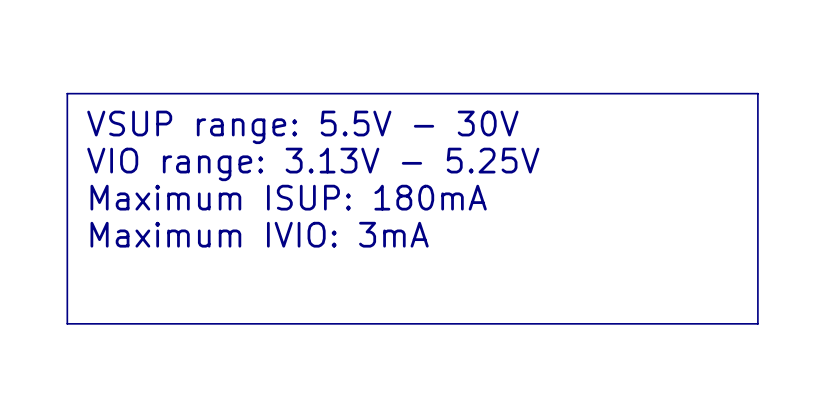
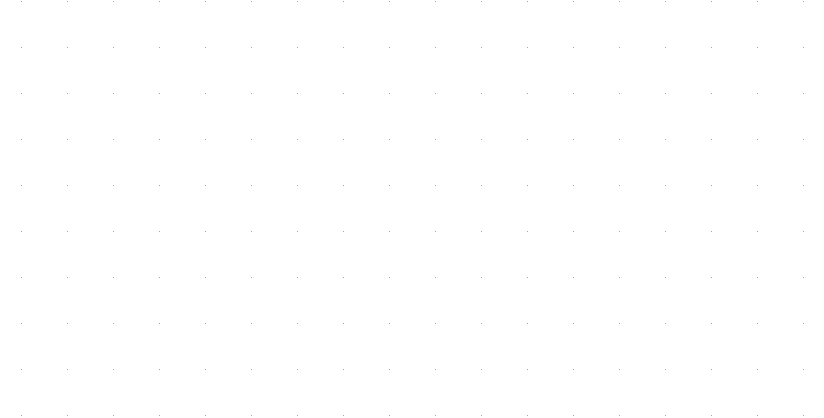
line: (67, 93) (757, 93) (757, 323) (67, 323) (67, 93) -> none
text: VSUP range: 5.5V - 30V (302, 127) -> none
text: VIO range: 3.13V - 5.25V (313, 164) -> none
text: Maximum ISUP: 180mA (288, 197) -> none
text: Maximum IVIO: 3mA (259, 234) -> none

